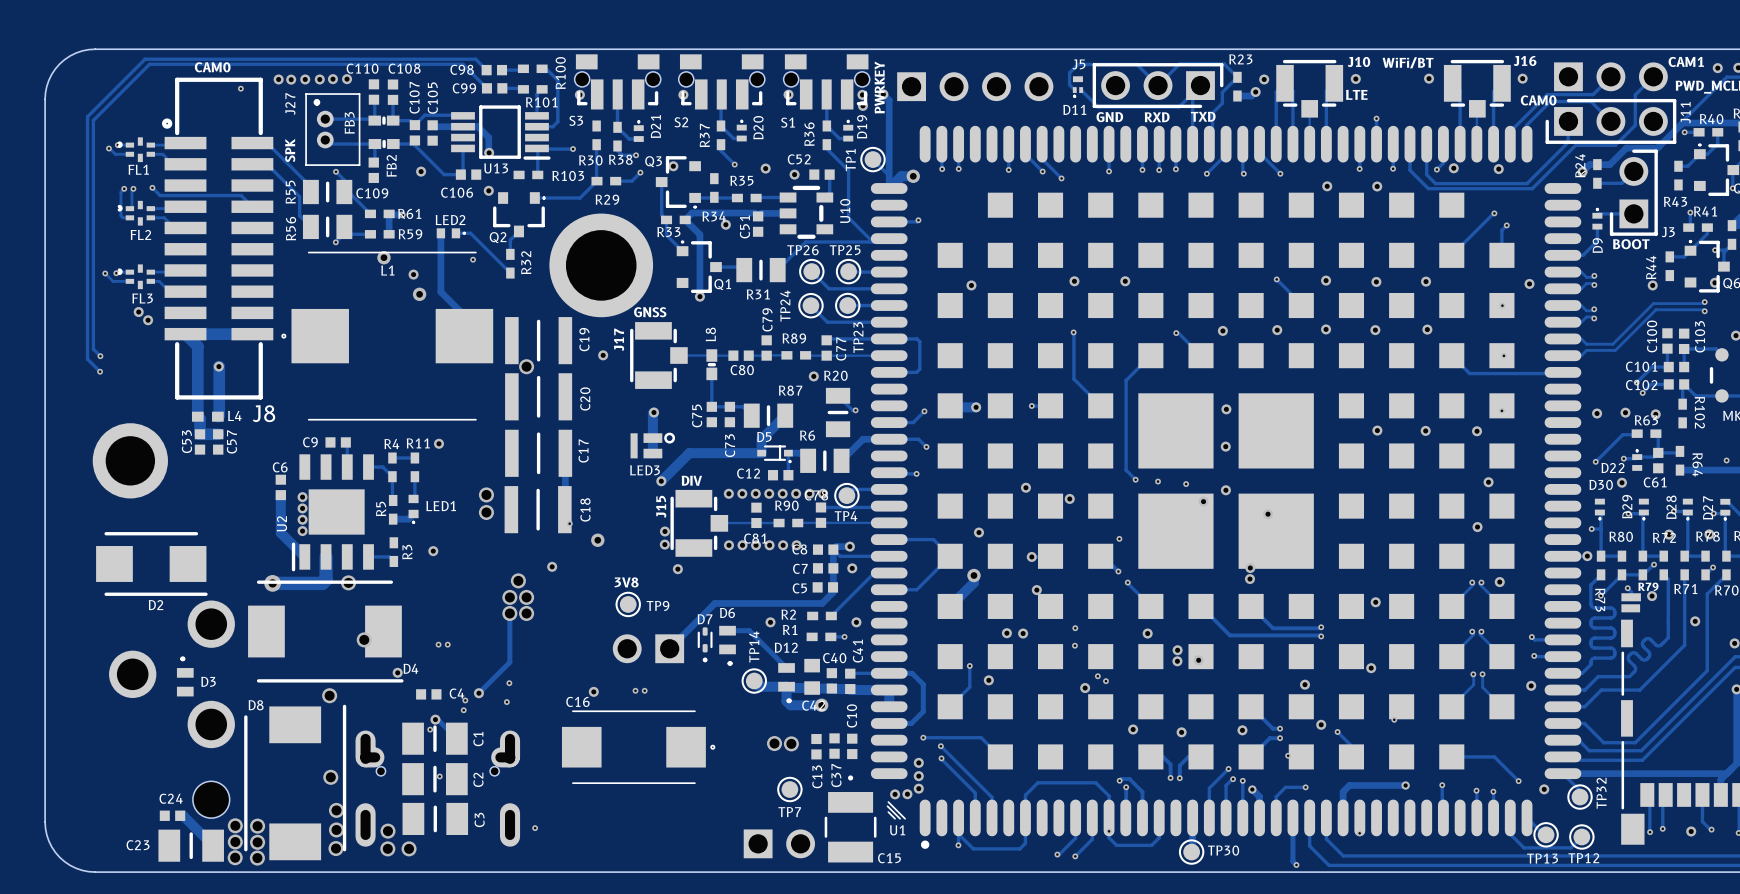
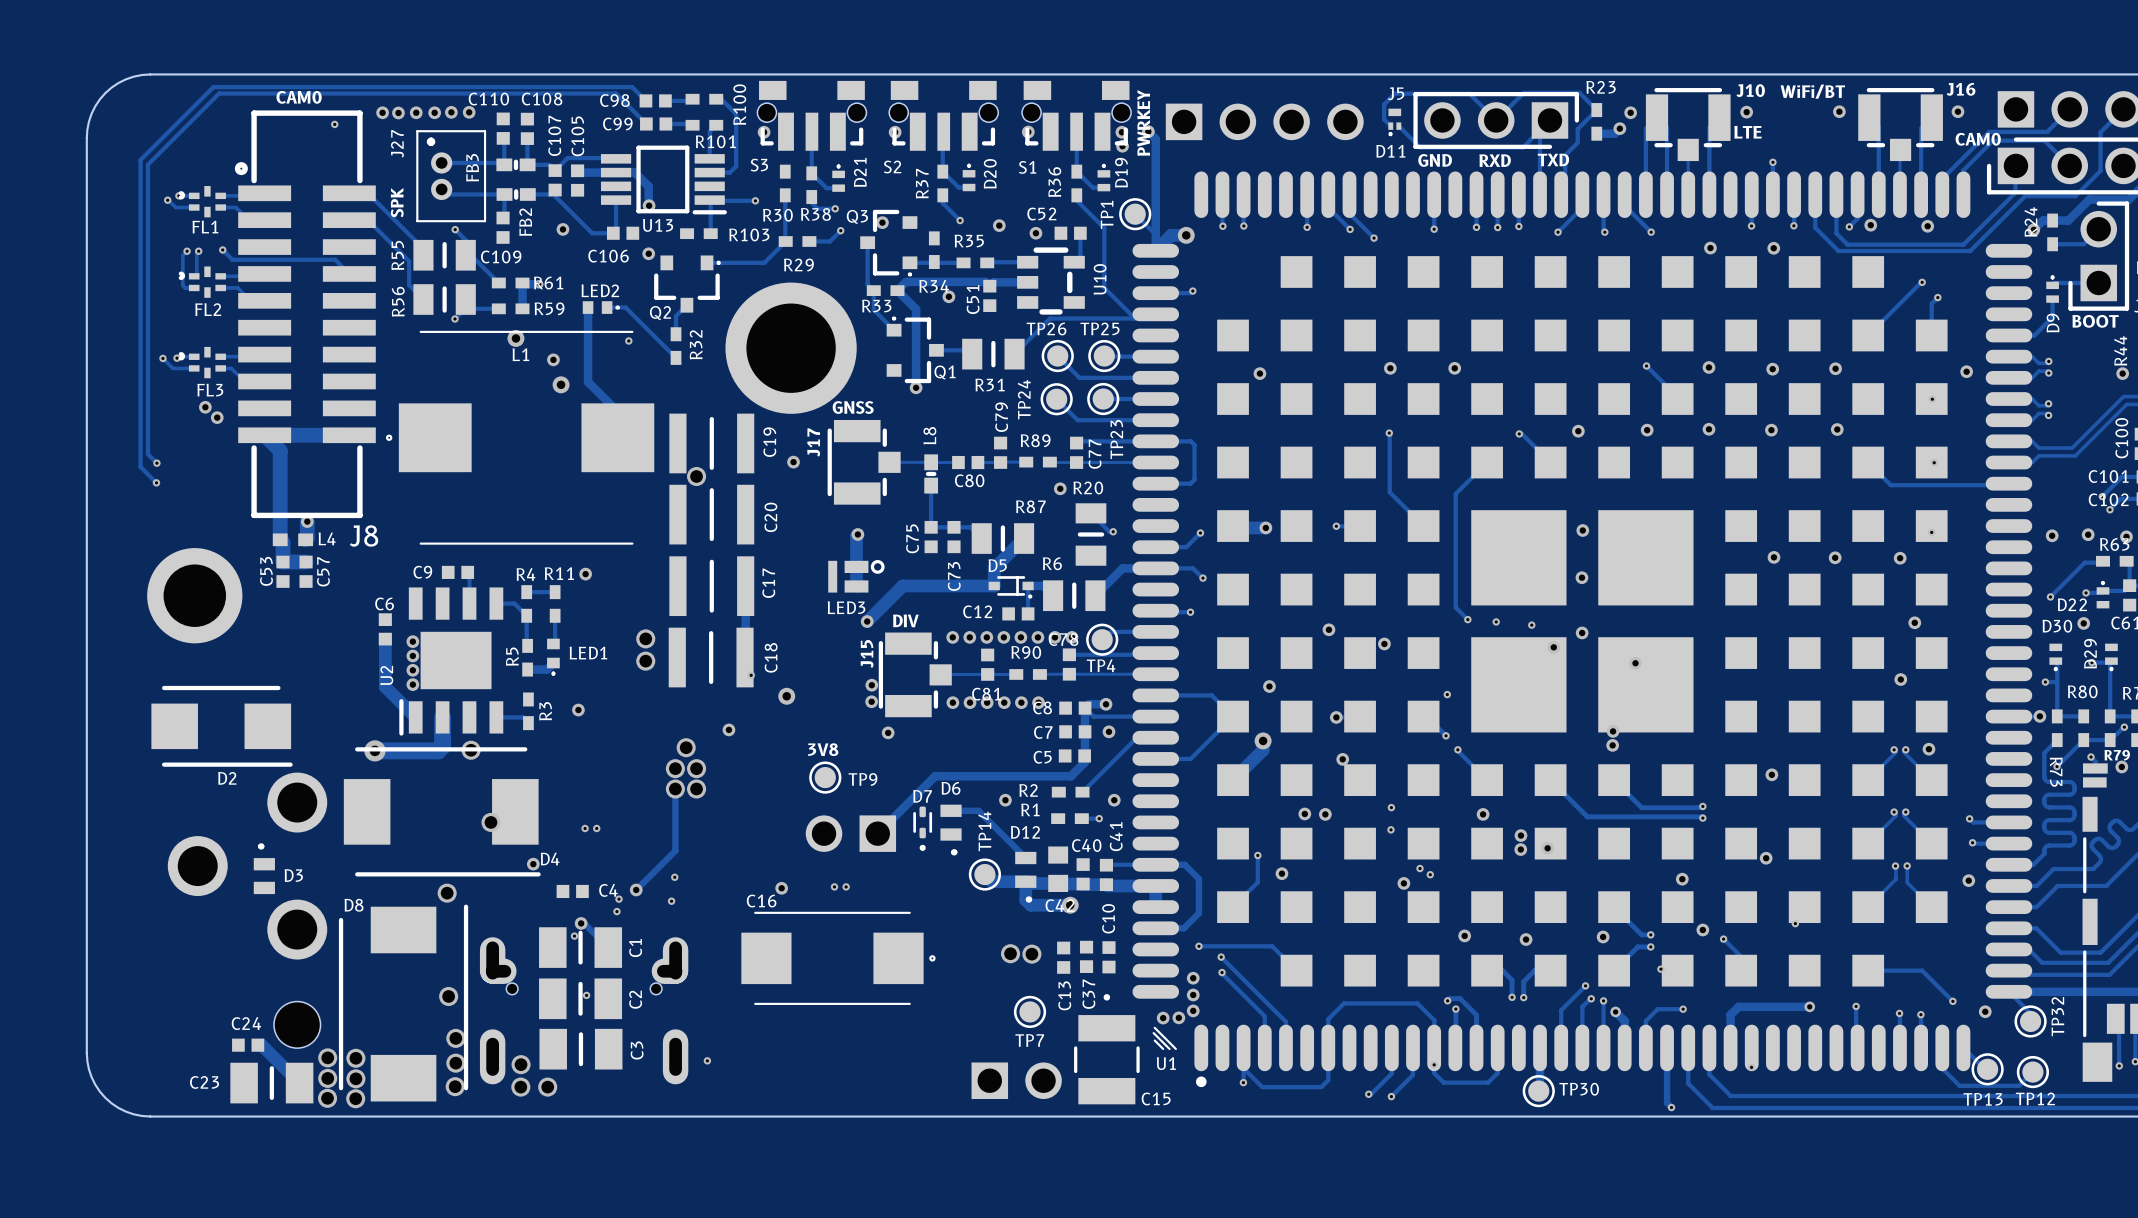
track: (218, 366) (219, 402) -> none
via position: (218, 366) -> (307, 521)

